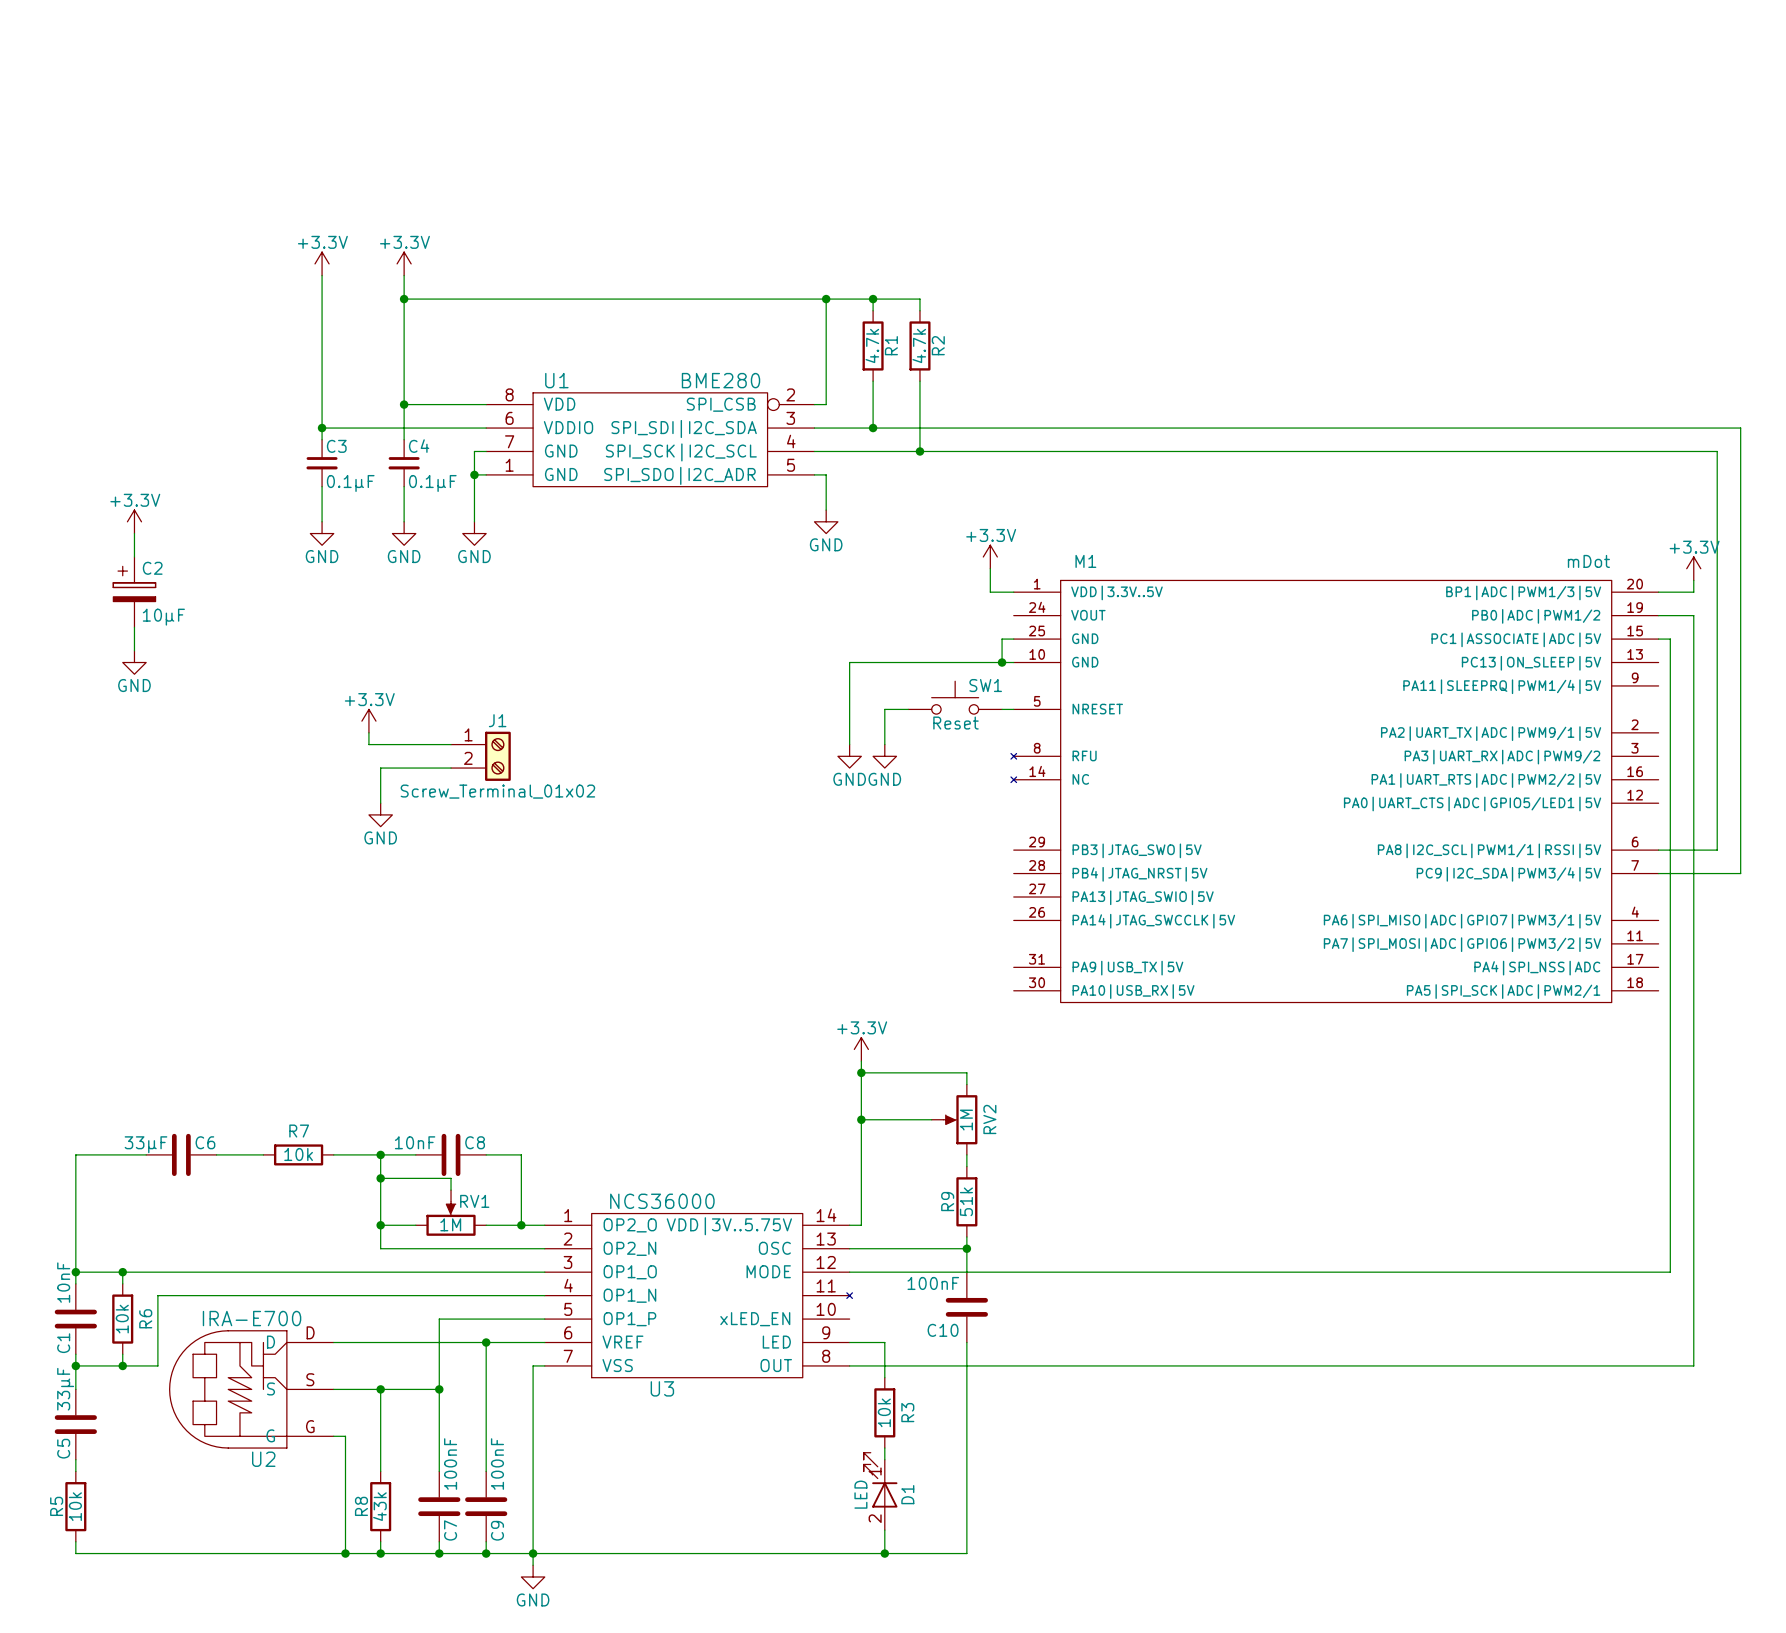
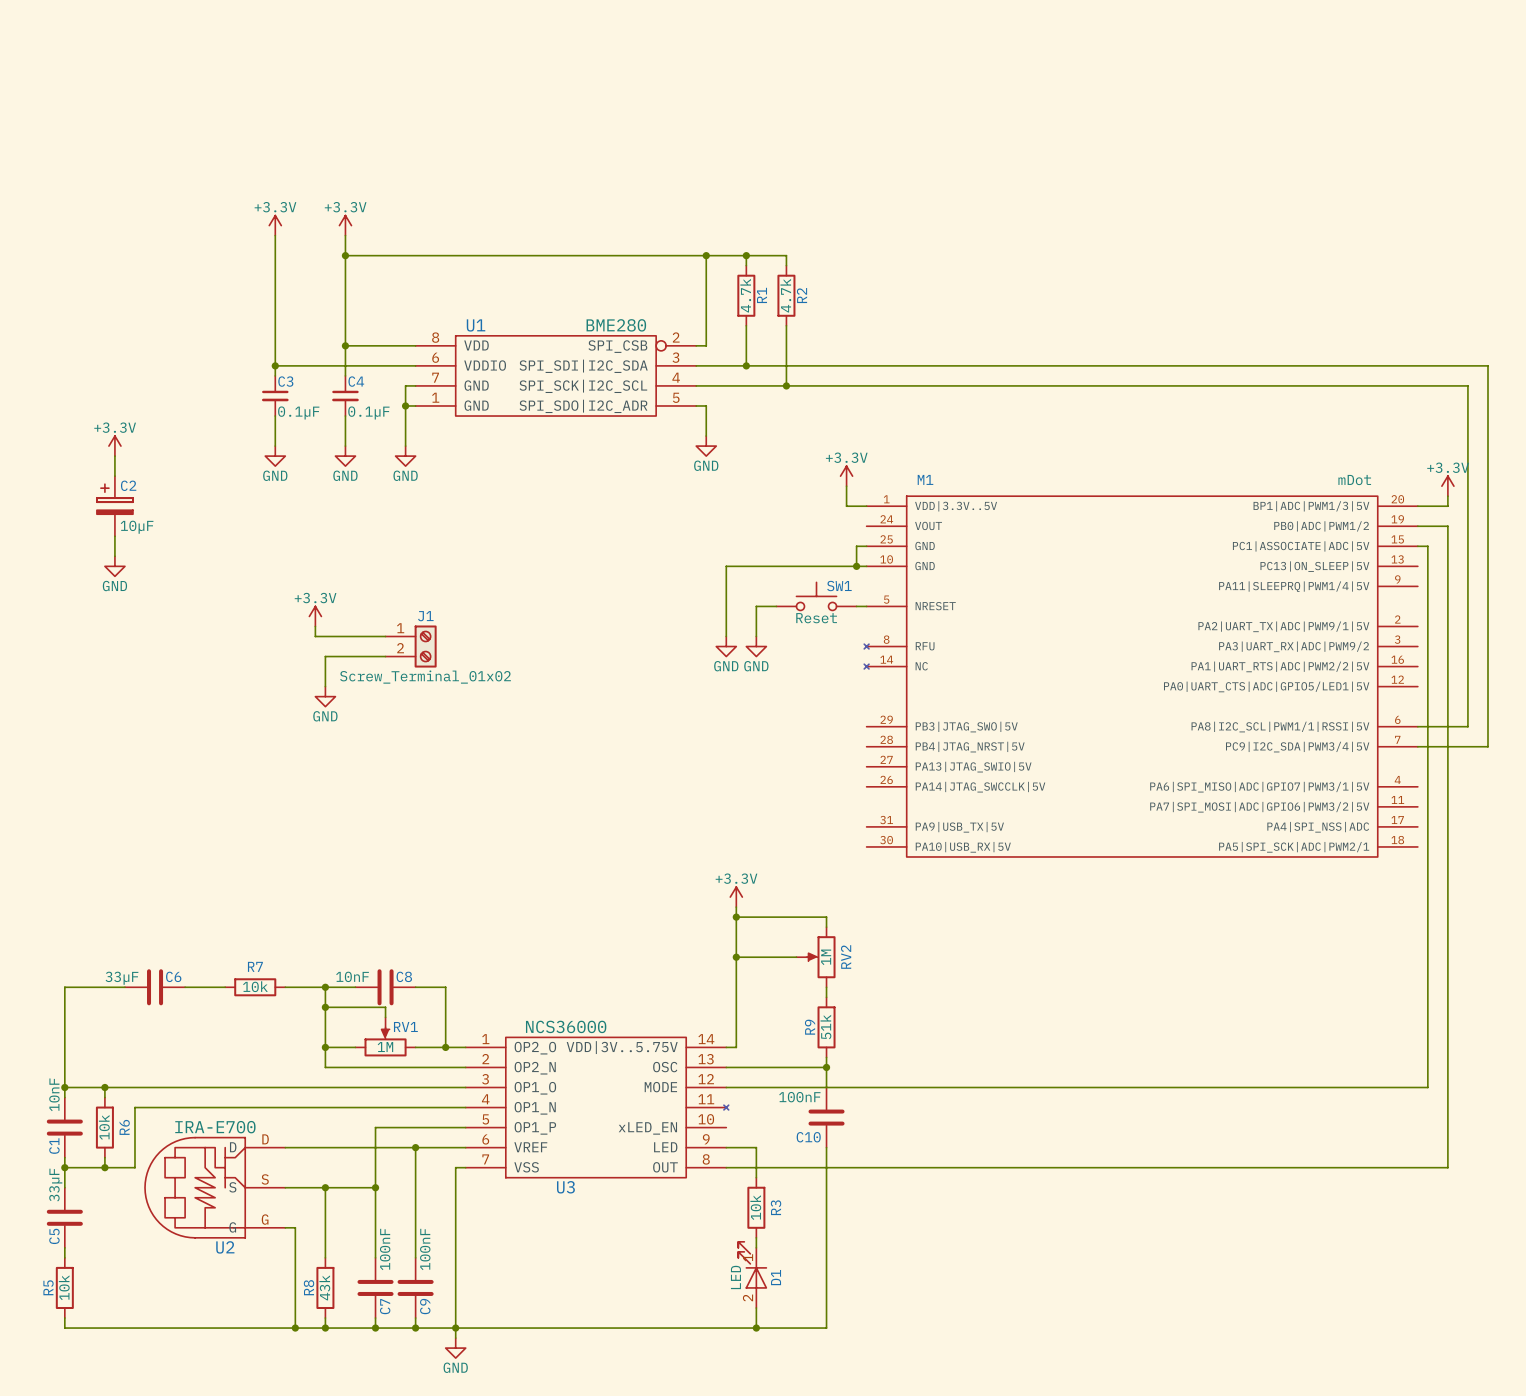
RV2 flip: as is (960, 1119) -> up-down (821, 957)

